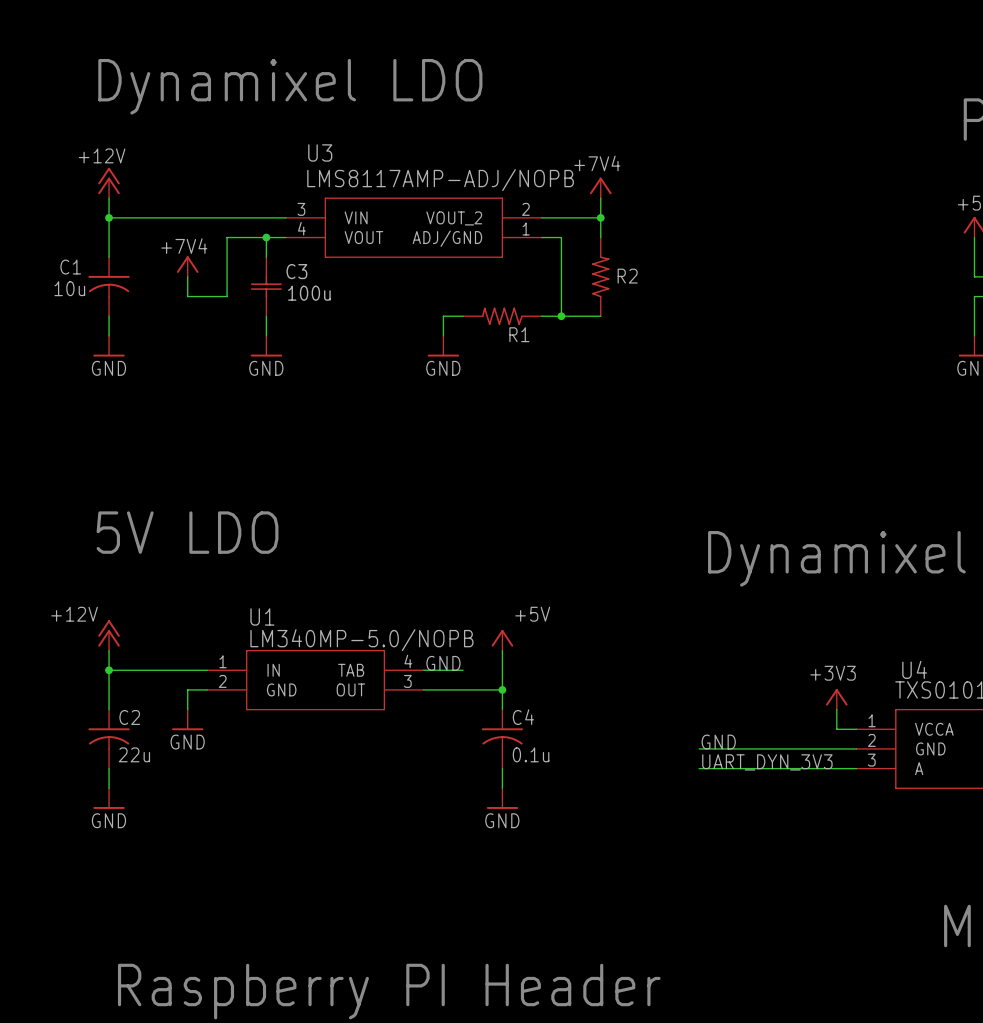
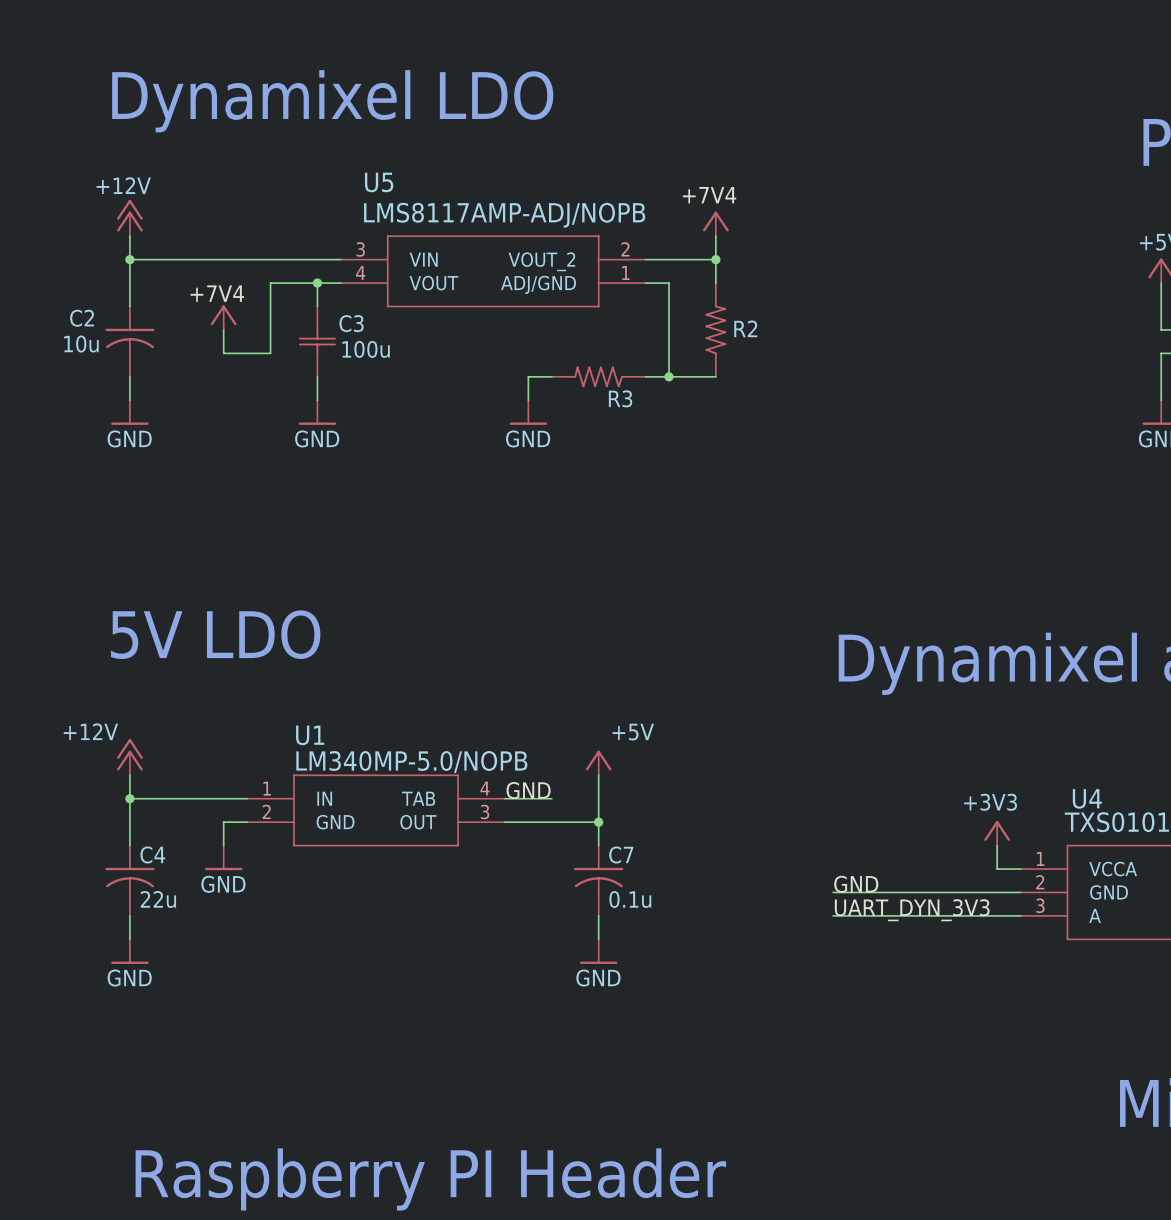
U3 name: U3 (320, 152) -> U5 (379, 182)
C1 name: C1 (70, 267) -> C2 (82, 318)
R1 name: R1 (519, 334) -> R3 (620, 398)
C2 name: C2 (129, 717) -> C4 (152, 854)
C4 name: C4 (523, 717) -> C7 (621, 854)

